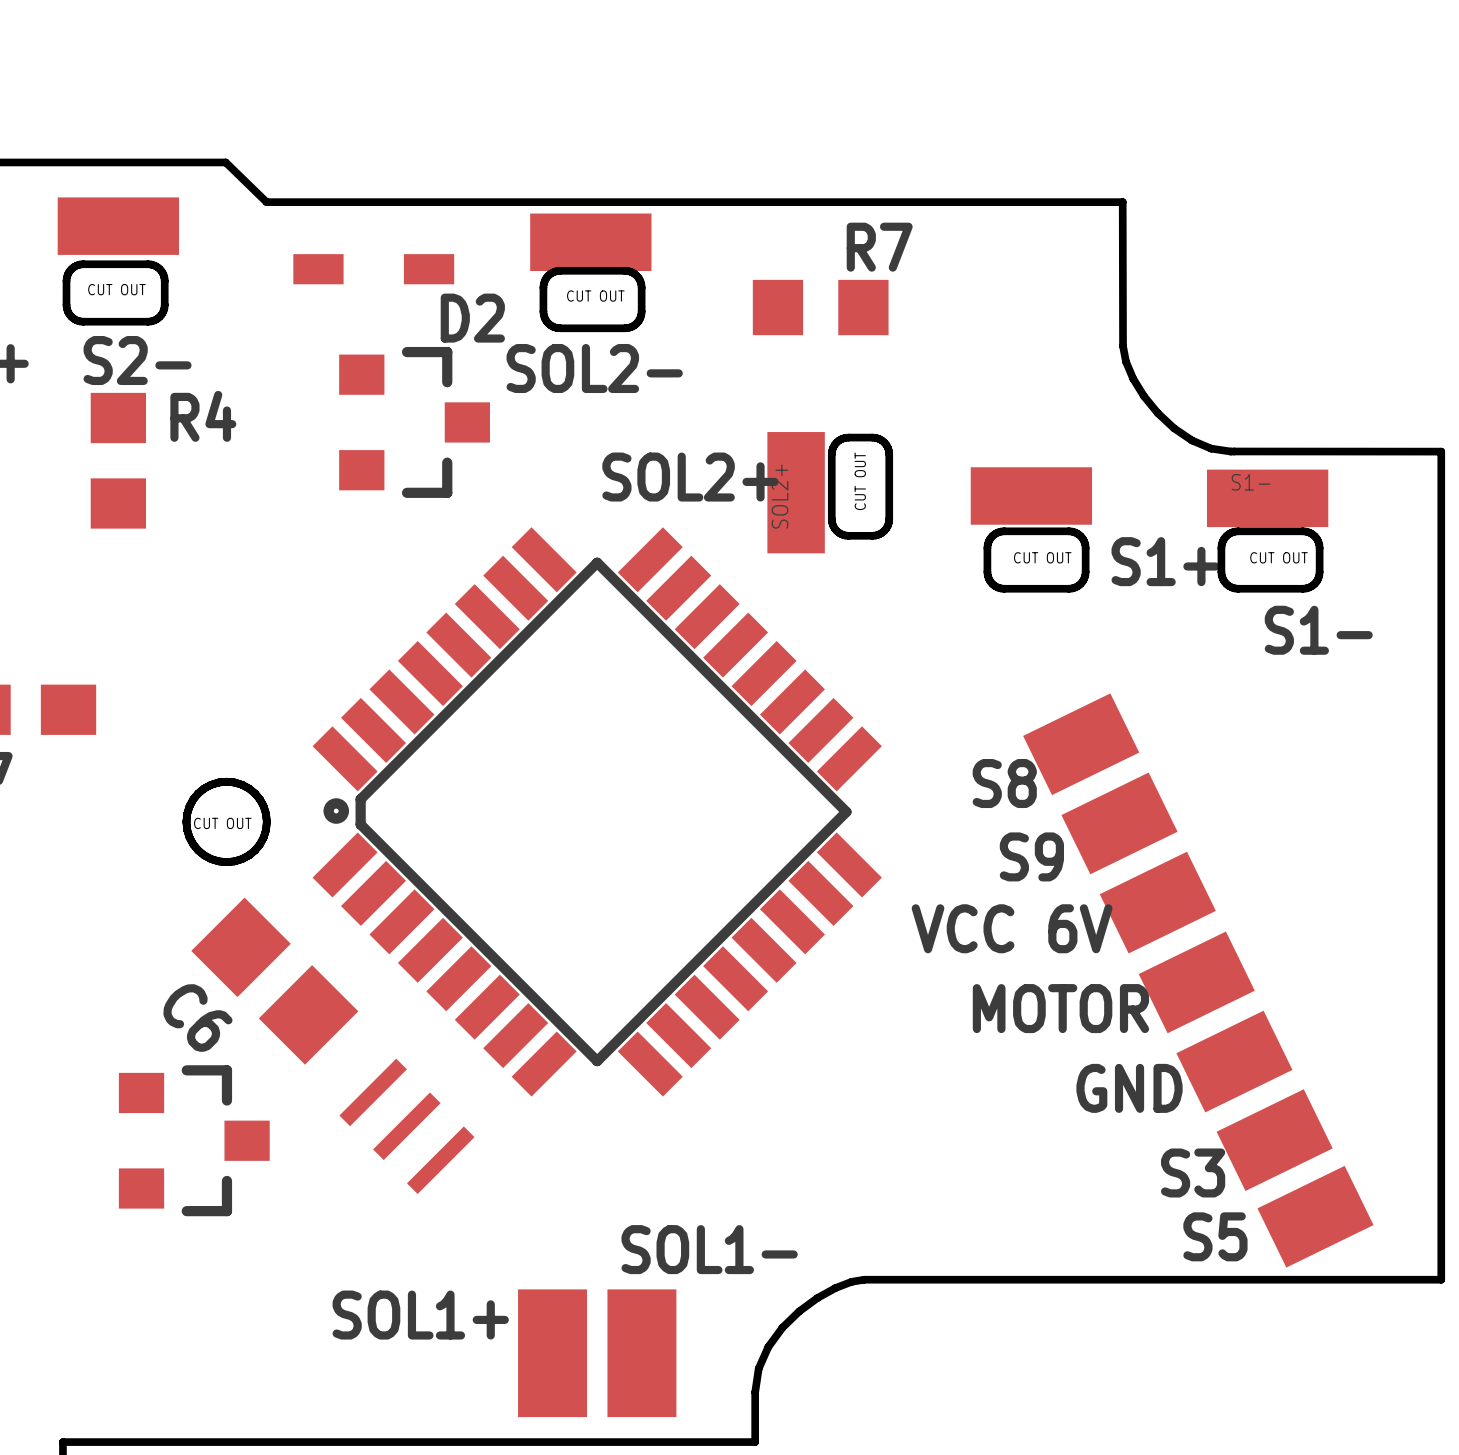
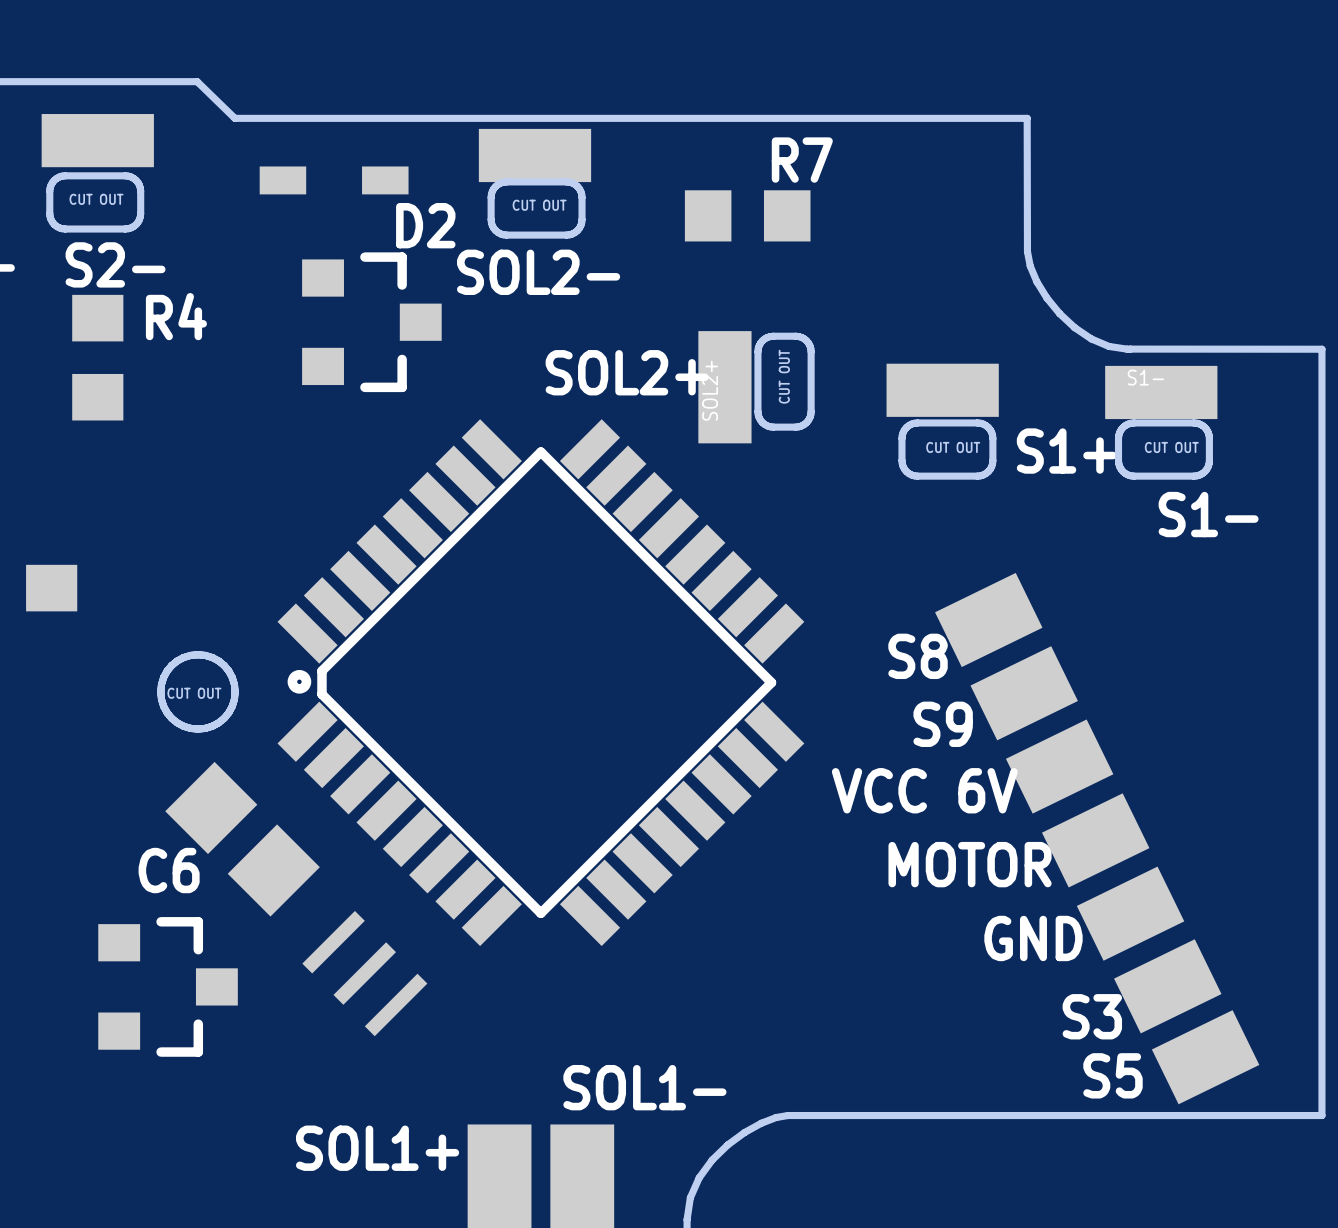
C6 name rotation: 0° (197, 1018) -> 45° counterclockwise (169, 870)

